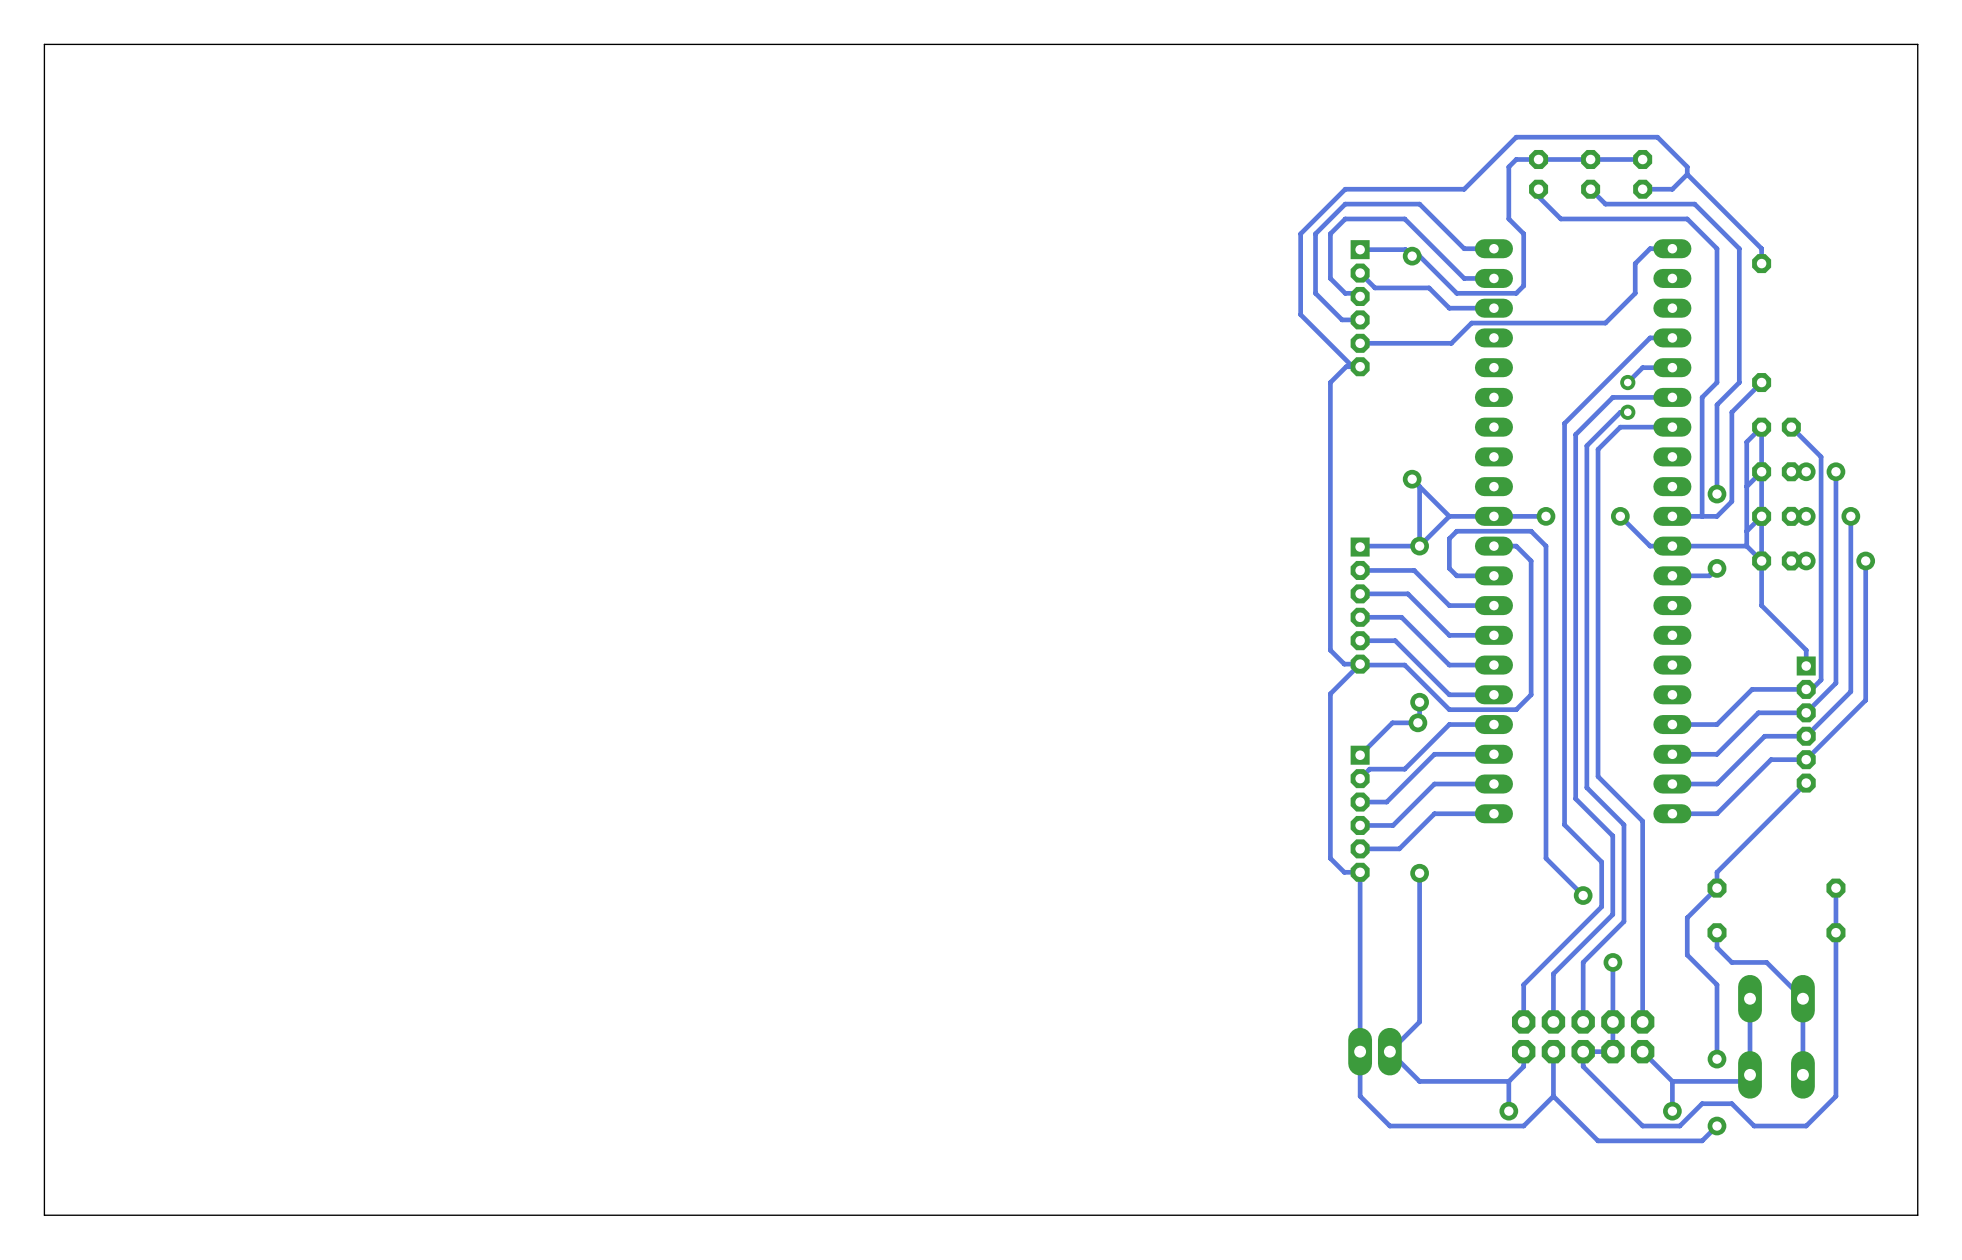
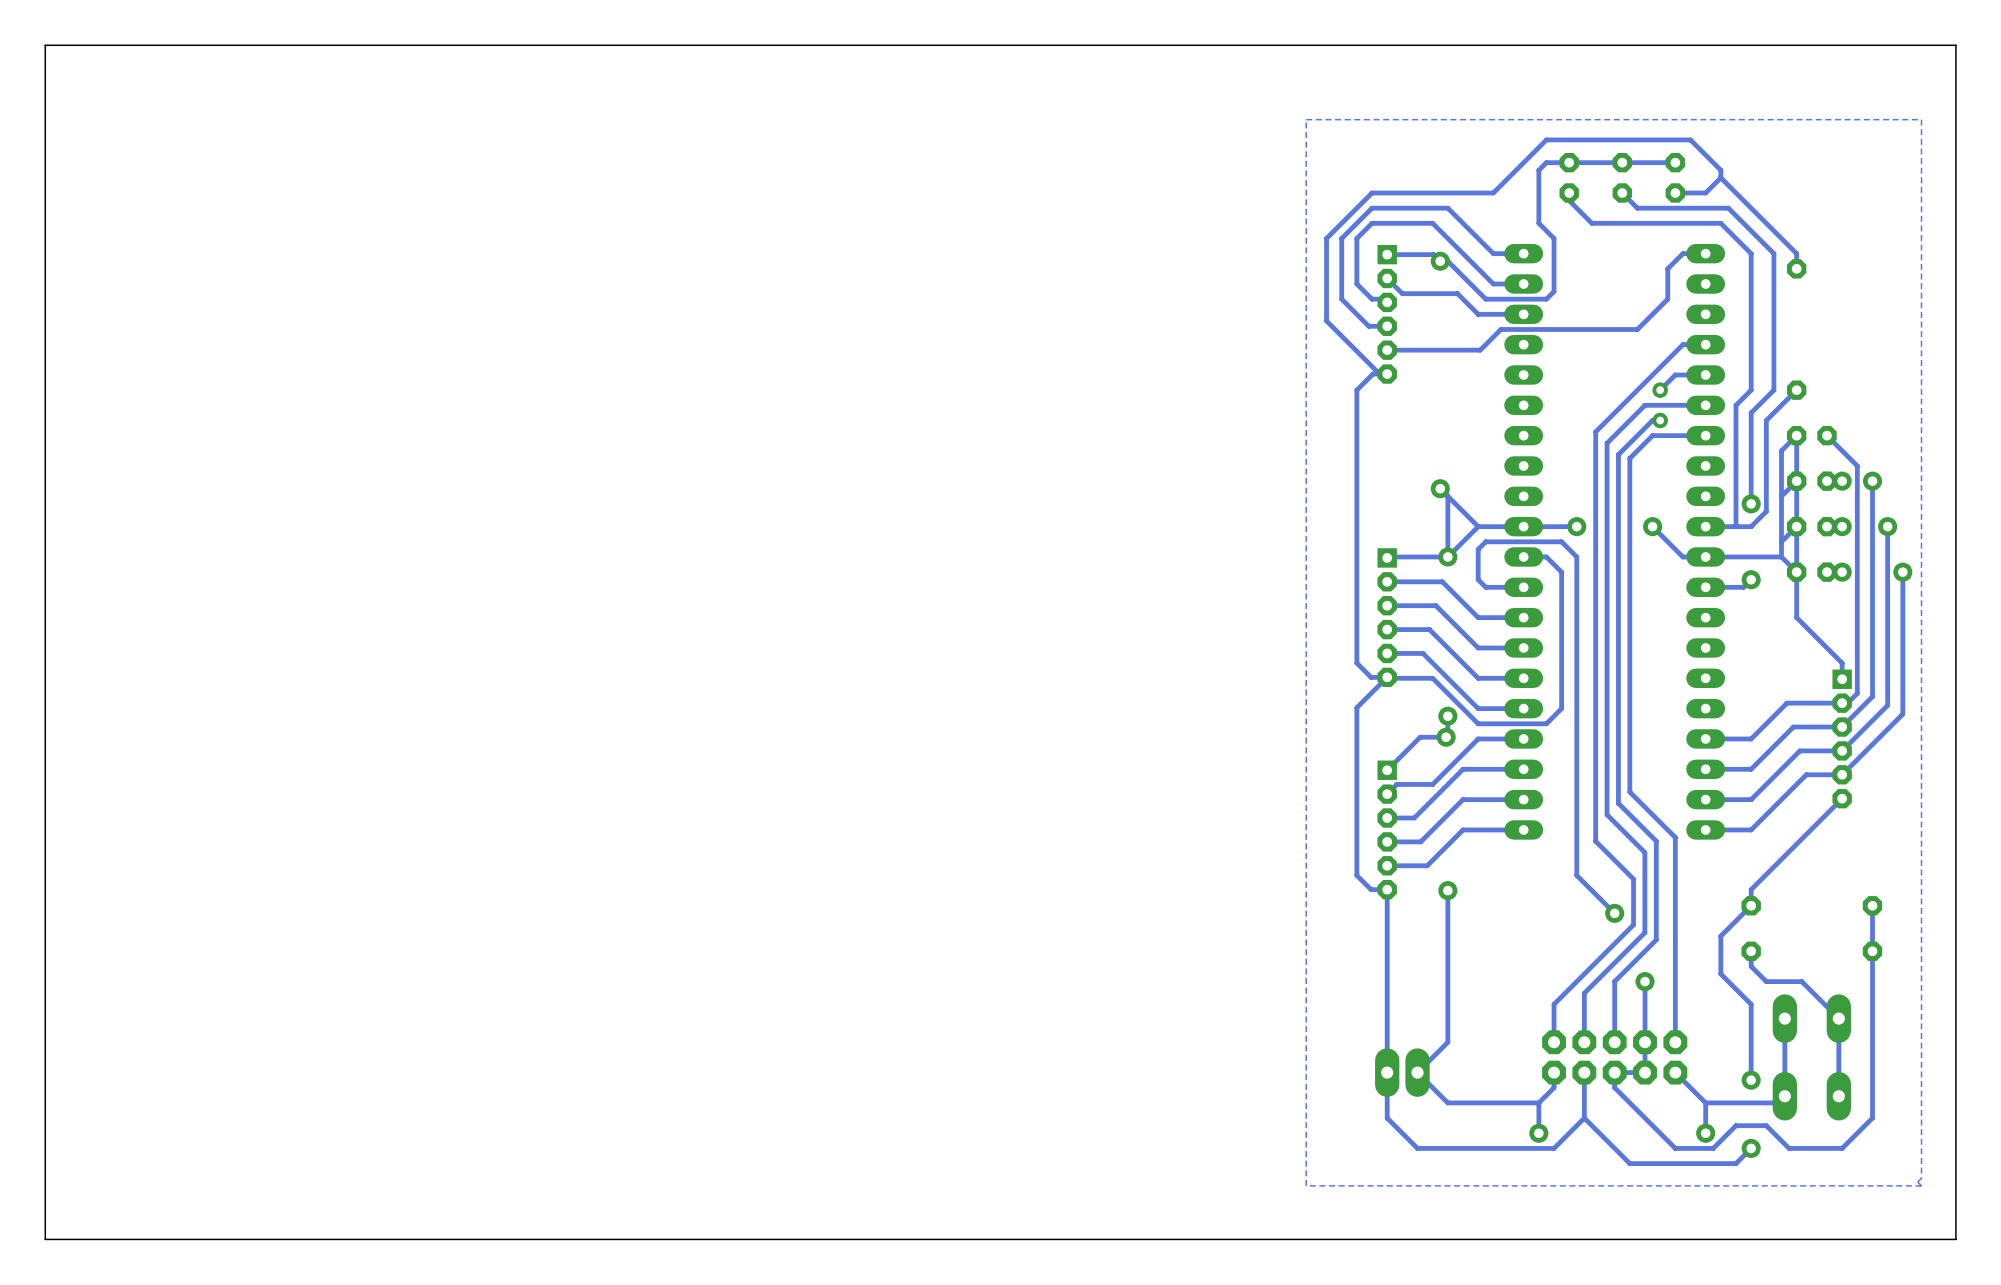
zone outline: none -> (1921, 119) (1306, 119) (1306, 1185) (1921, 1185) (1917, 1182) (1921, 1178) (1921, 119)

